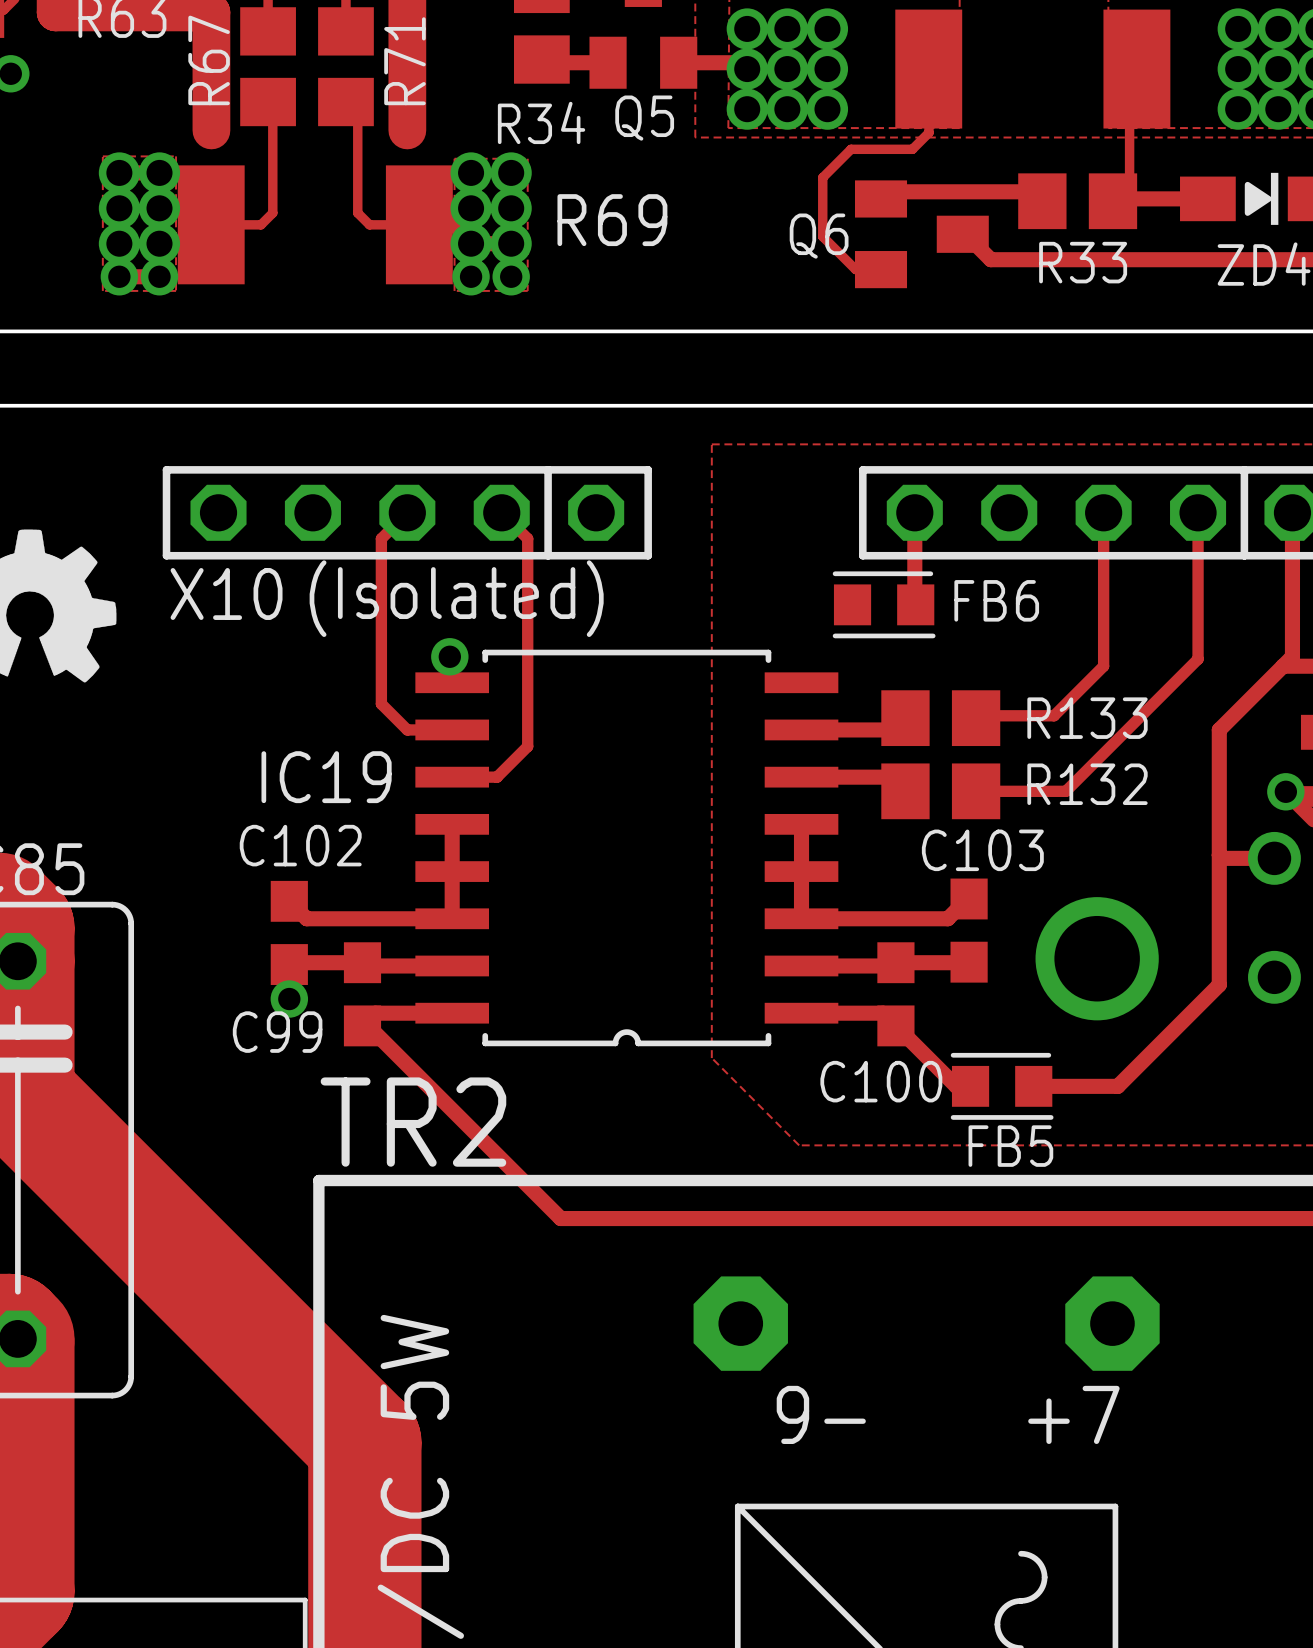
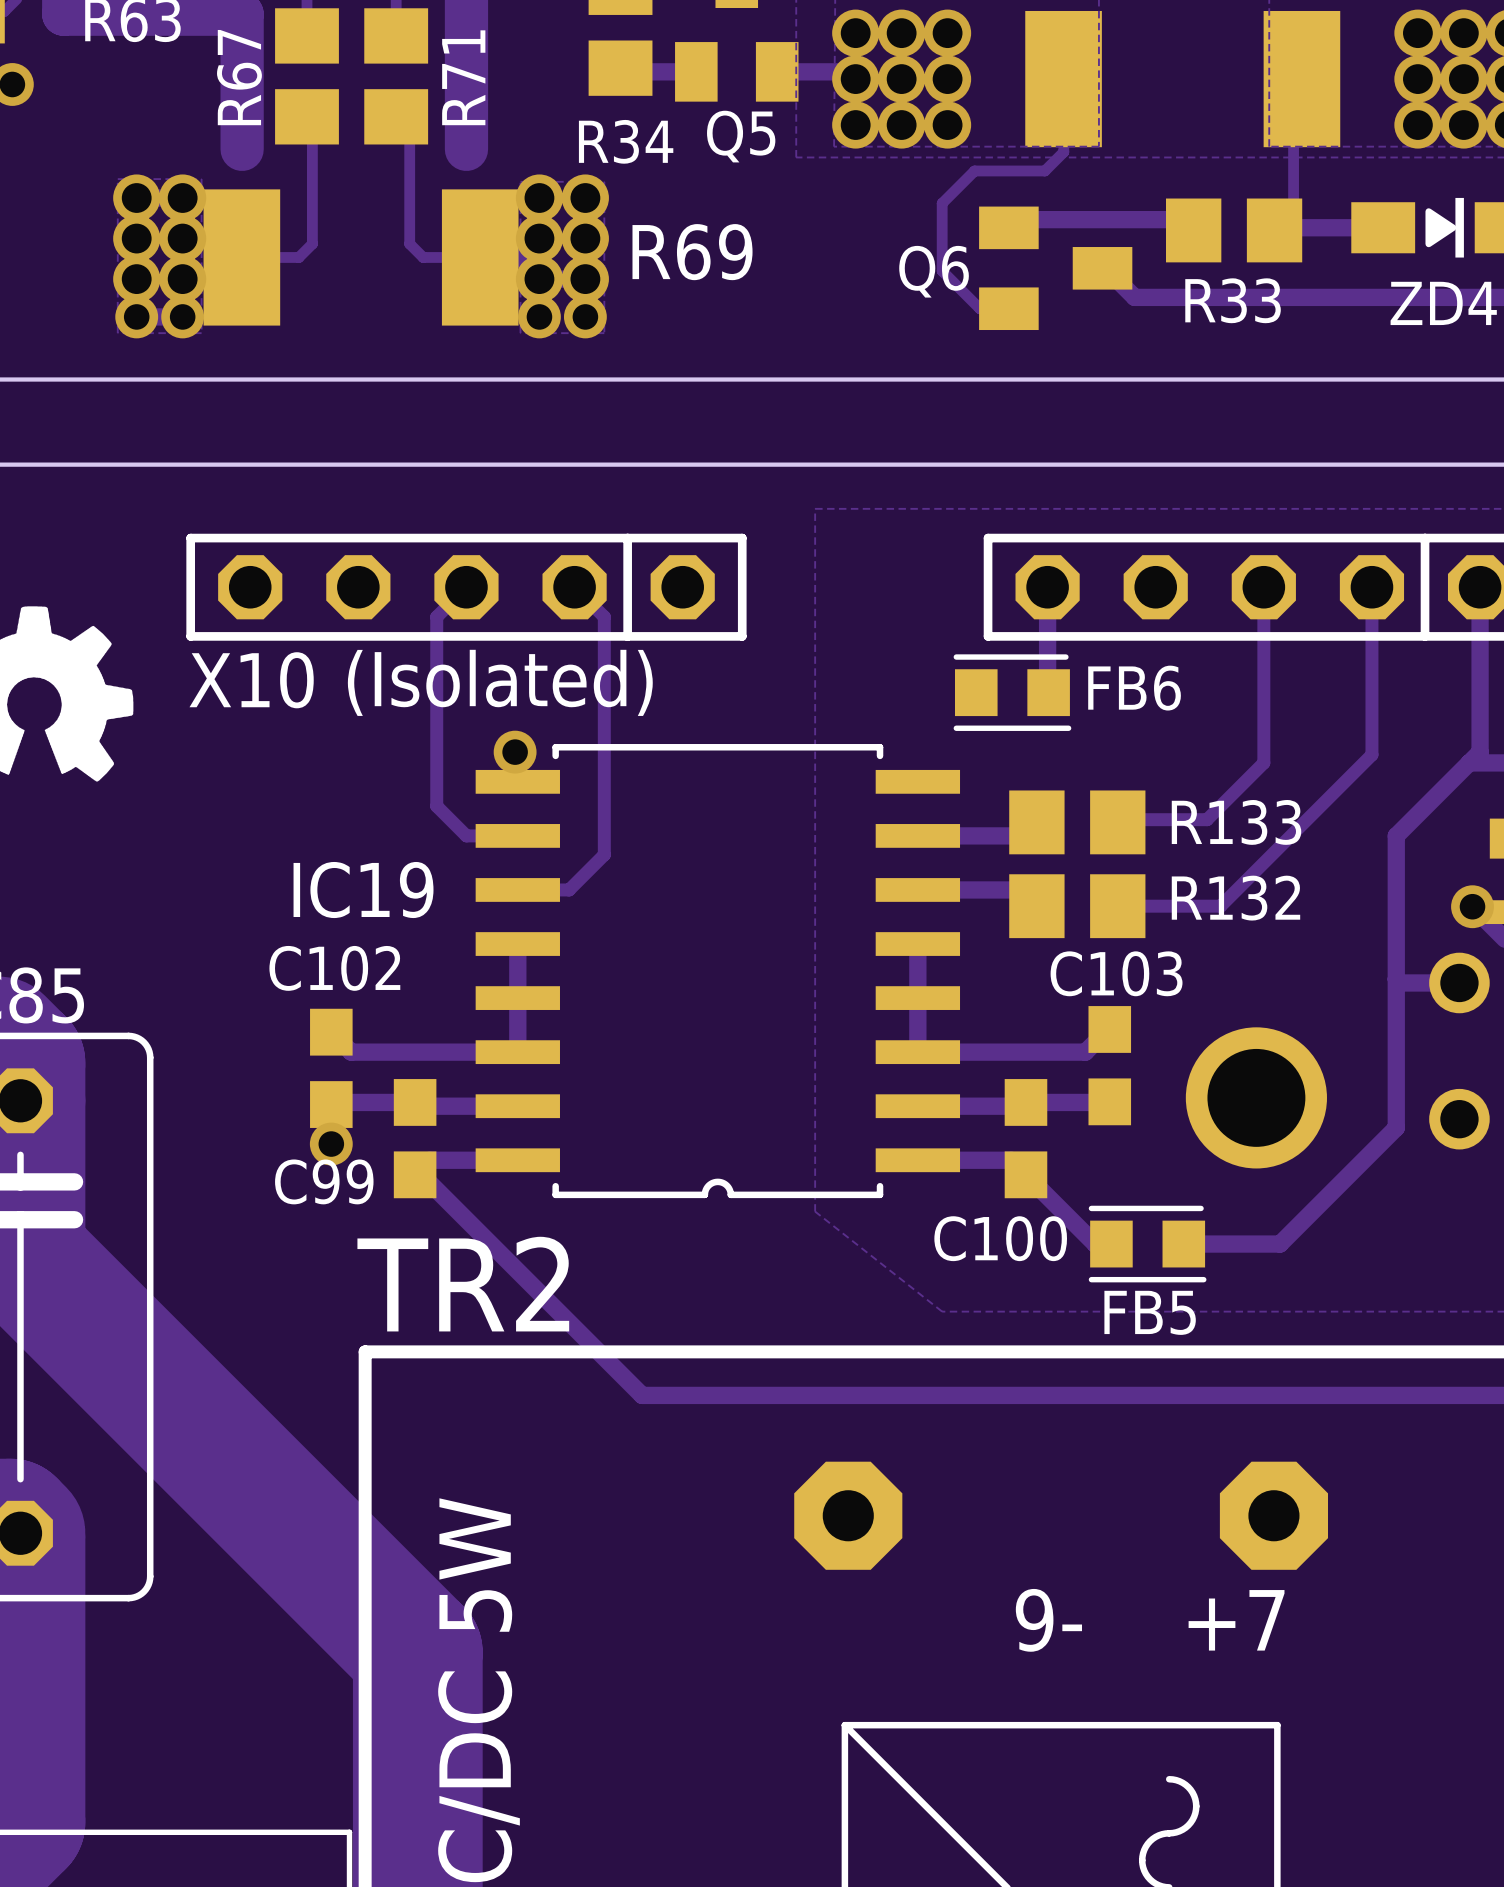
zone outline: (711, 1058) (799, 1145) (822, 1145) -> (815, 1211) (942, 1311)

